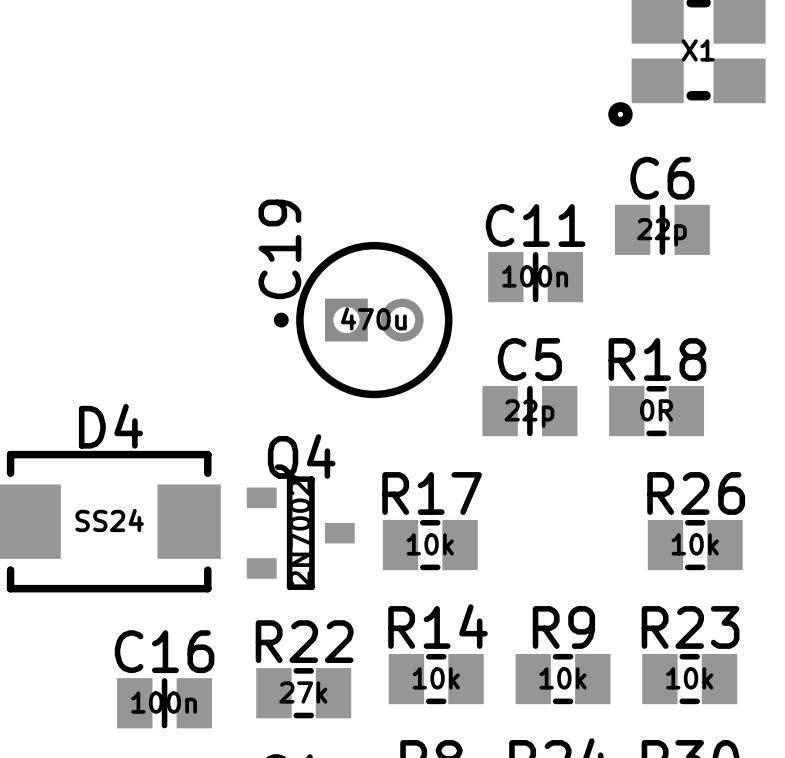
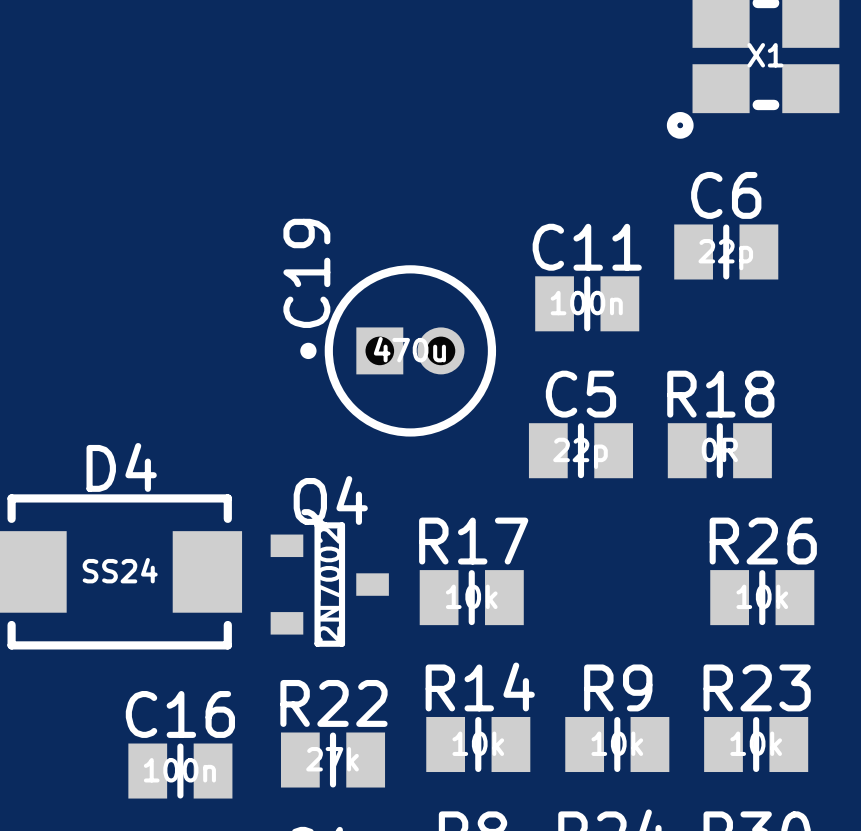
R18 footprint: [609, 385, 705, 437] -> [667, 423, 772, 479]
R17 footprint: [382, 519, 478, 571] -> [419, 570, 524, 626]
R26 footprint: [647, 519, 743, 571] -> [710, 570, 815, 626]
R14 footprint: [388, 653, 484, 705] -> [426, 716, 531, 773]
R9 footprint: [515, 653, 611, 705] -> [565, 716, 670, 773]
R23 footprint: [642, 653, 738, 705] -> [704, 716, 809, 773]
R22 footprint: [256, 668, 352, 719] -> [280, 732, 386, 788]

